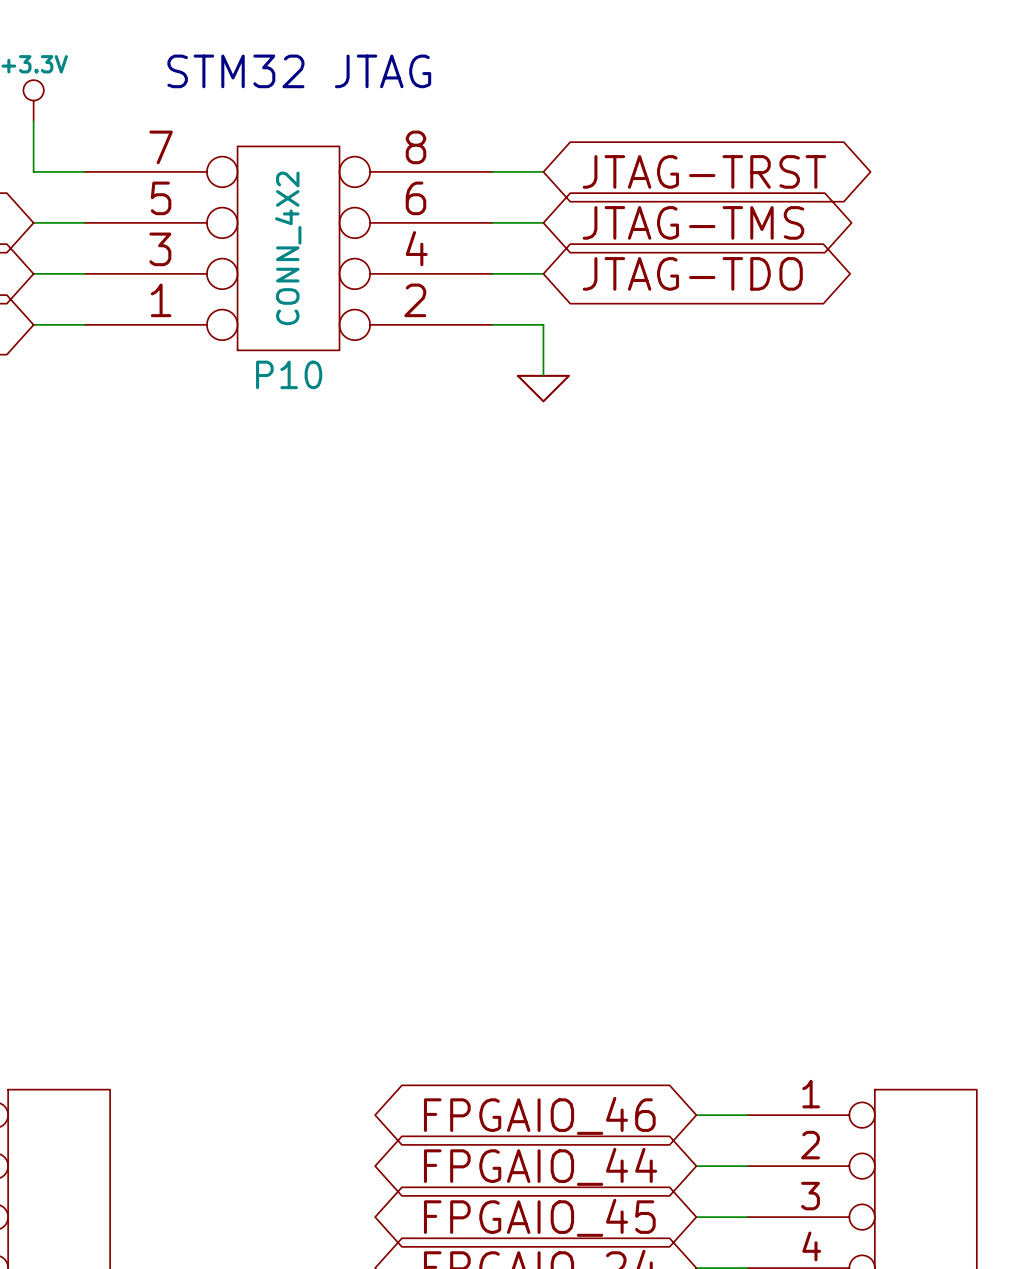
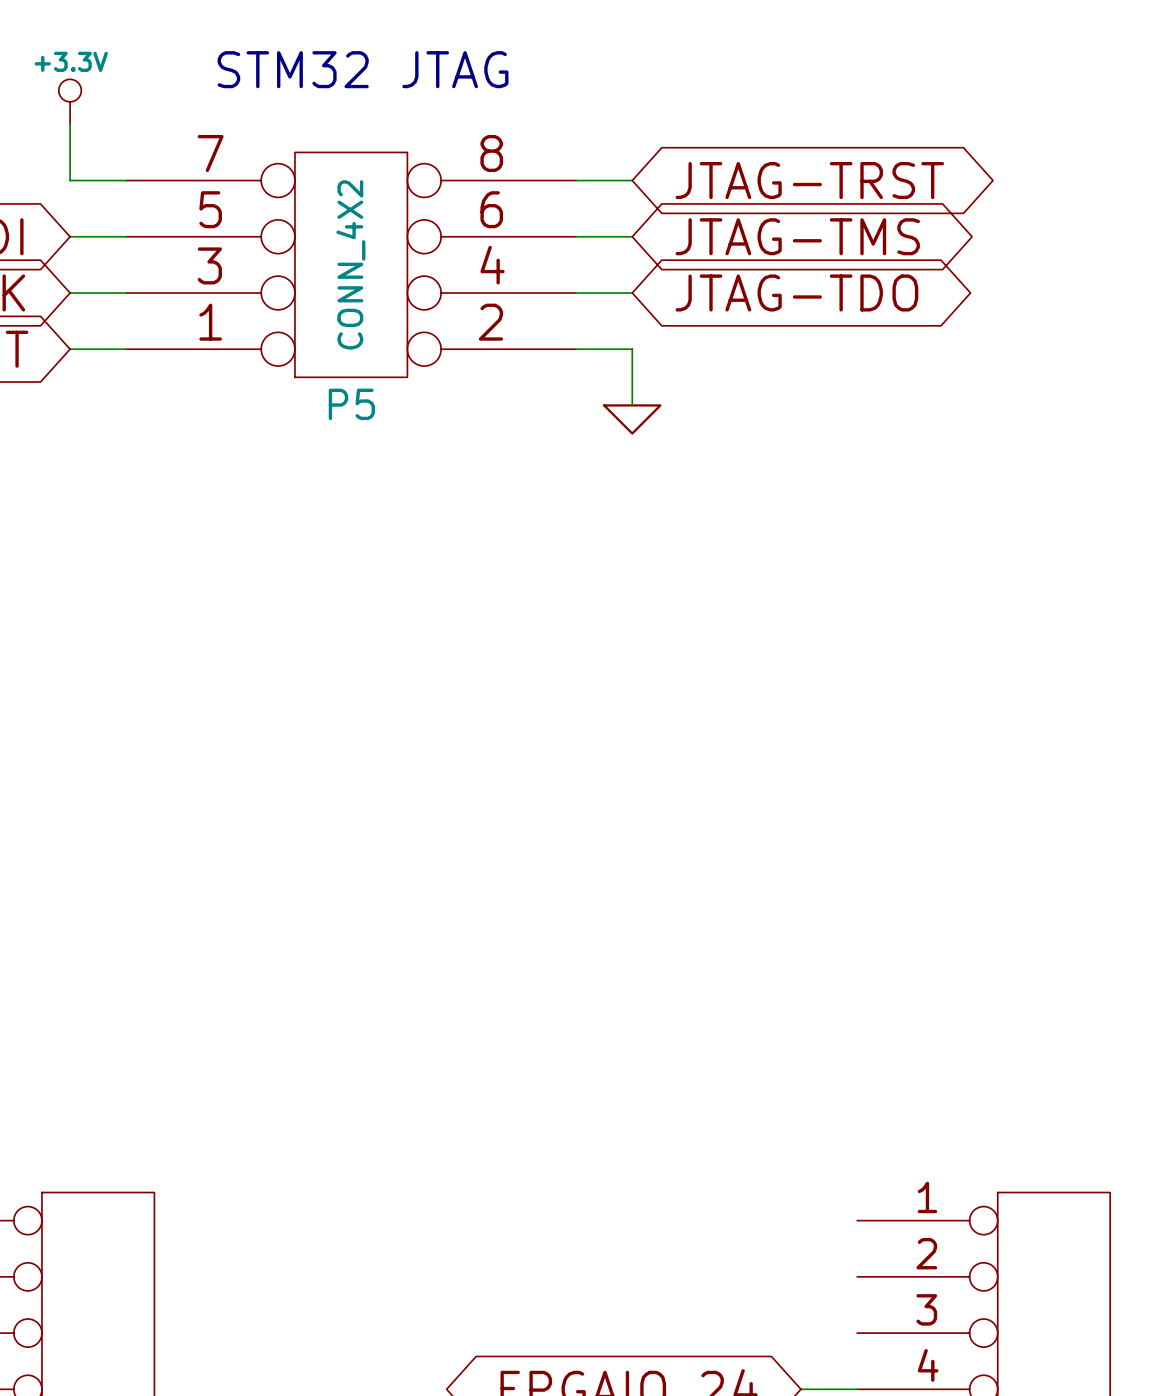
P10 name: P10 (289, 374) -> P5 (351, 404)
global label: FPGAIO_46 (539, 1115) -> none
wire: (696, 1115) (747, 1115) -> none
global label: FPGAIO_44 (540, 1166) -> none
wire: (696, 1166) (747, 1166) -> none
global label: FPGAIO_45 (539, 1217) -> none
wire: (696, 1217) (747, 1217) -> none

